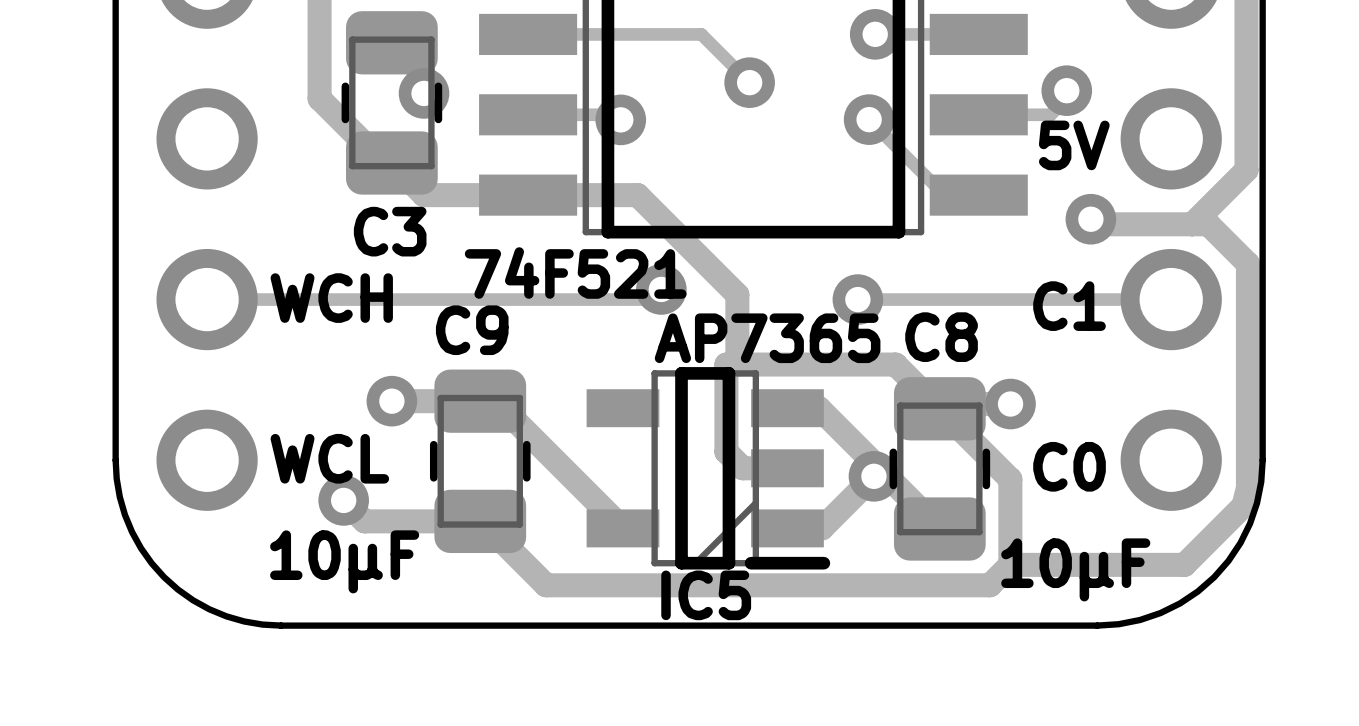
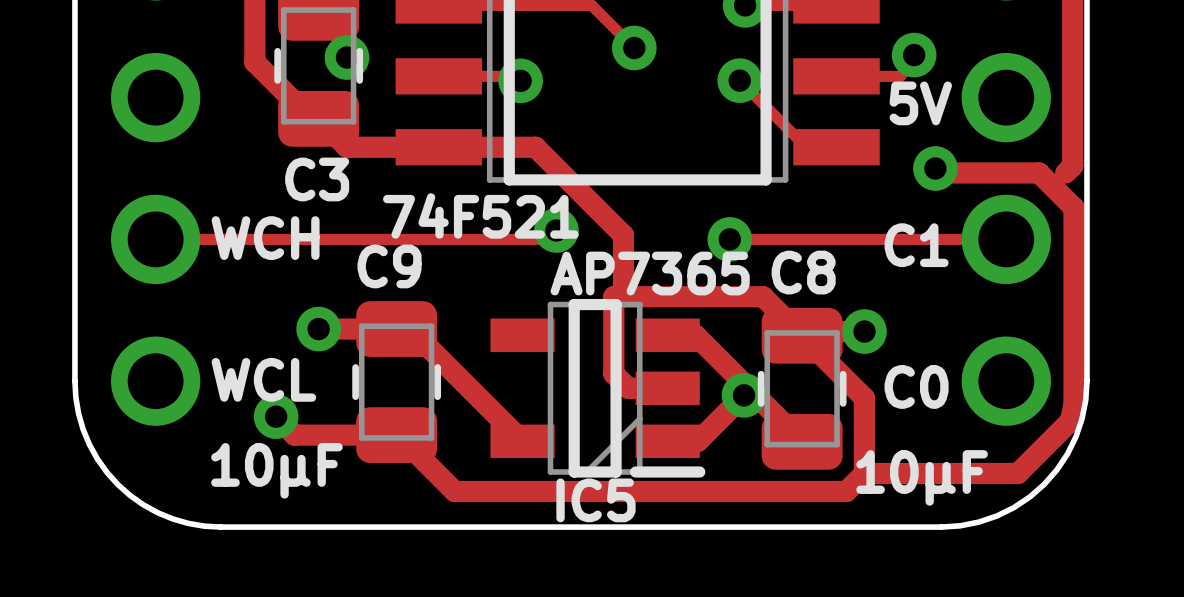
track: (1246, 170) (1192, 224) -> (1072, 125) (1072, 165) (1065, 172)

